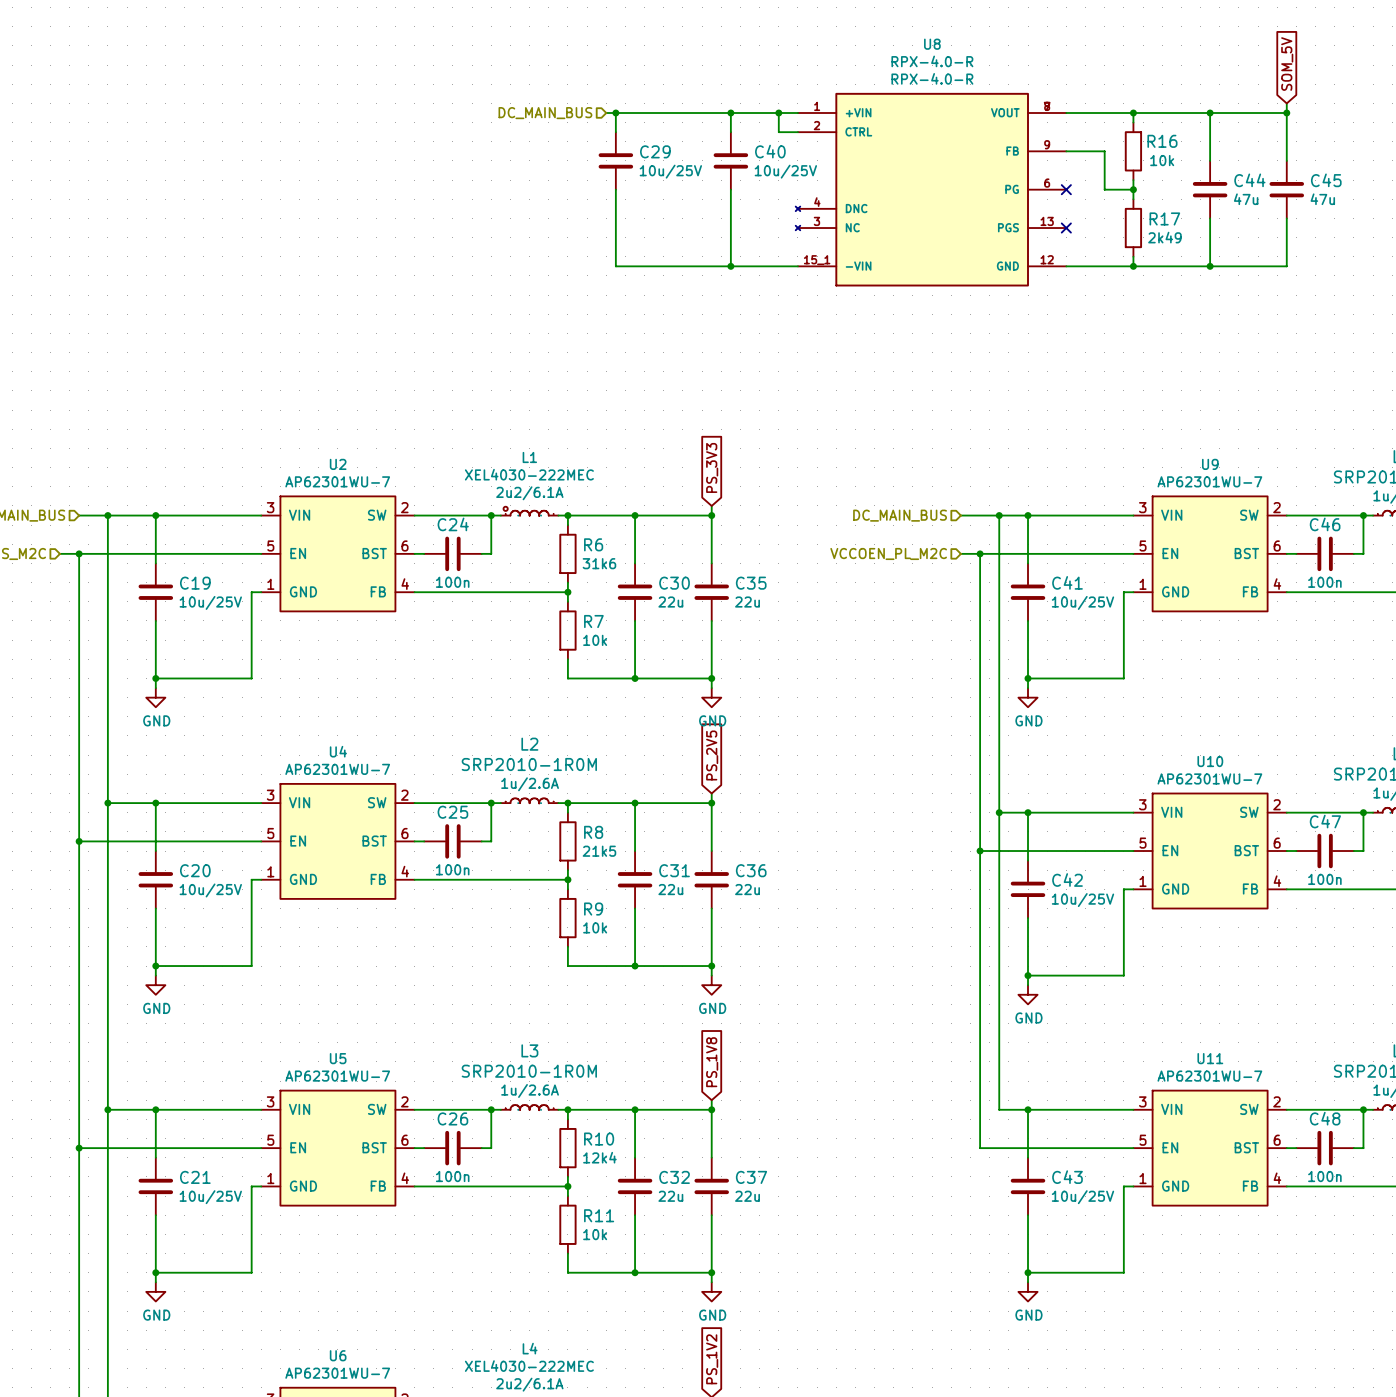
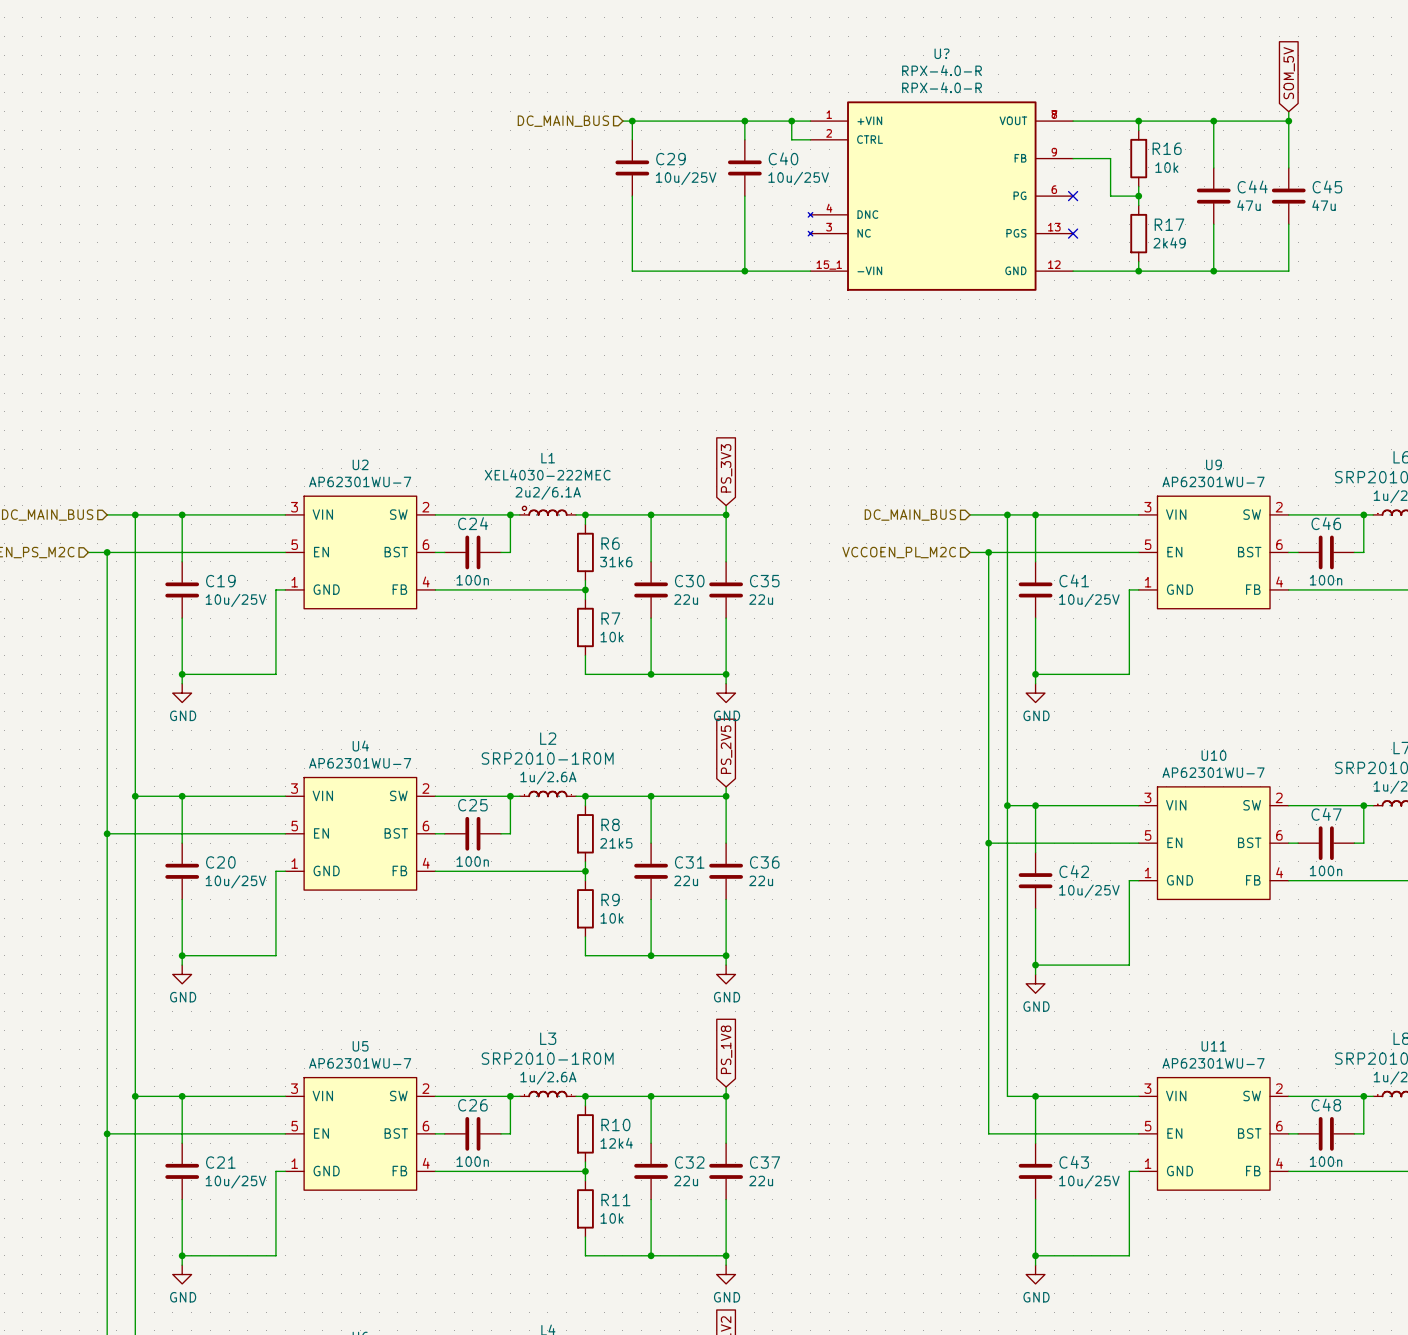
U8 name: U8 (932, 44) -> U? (942, 53)

